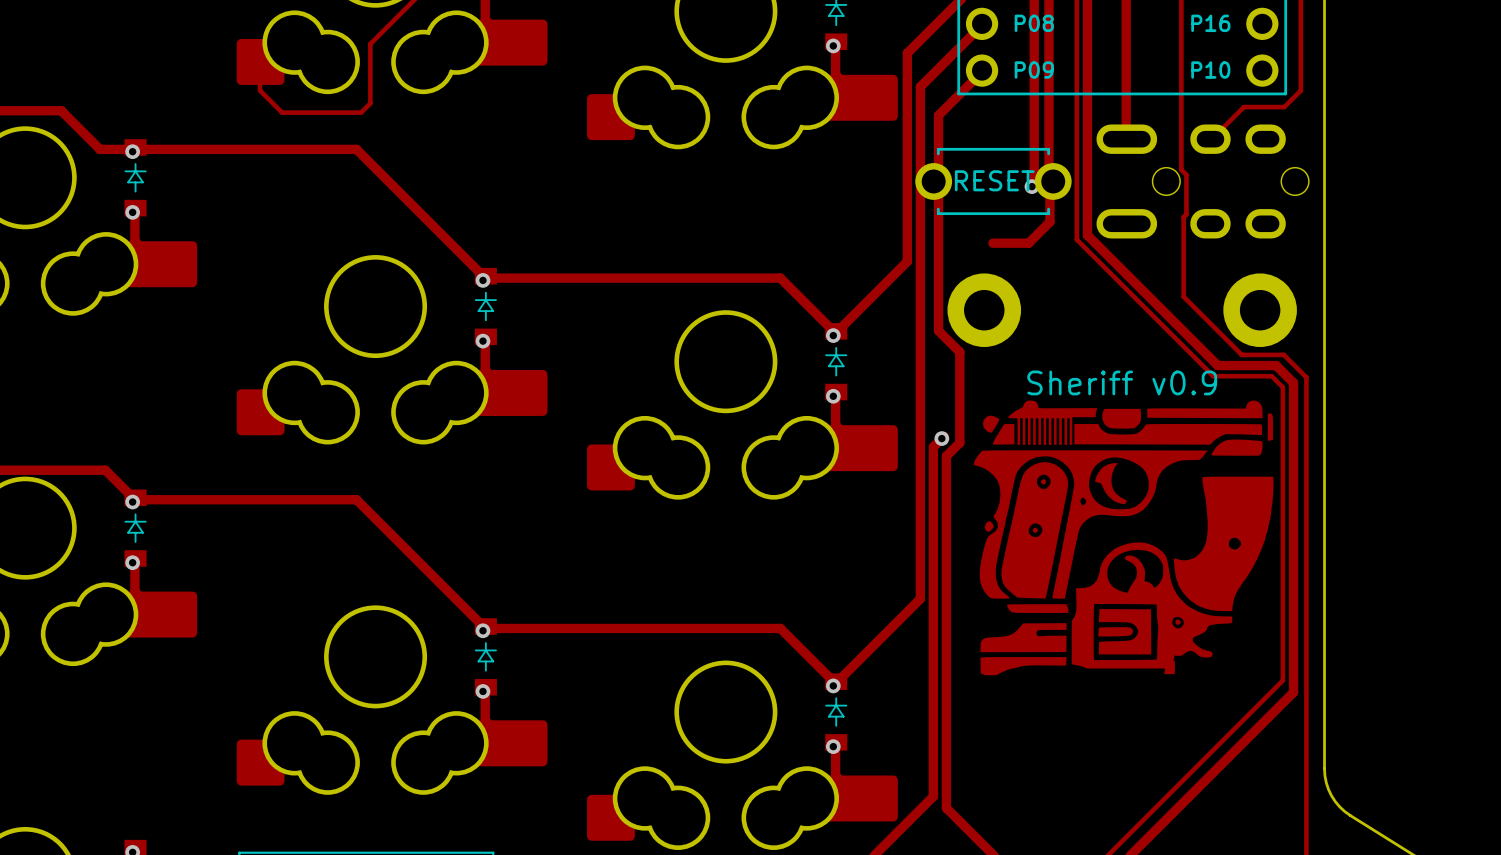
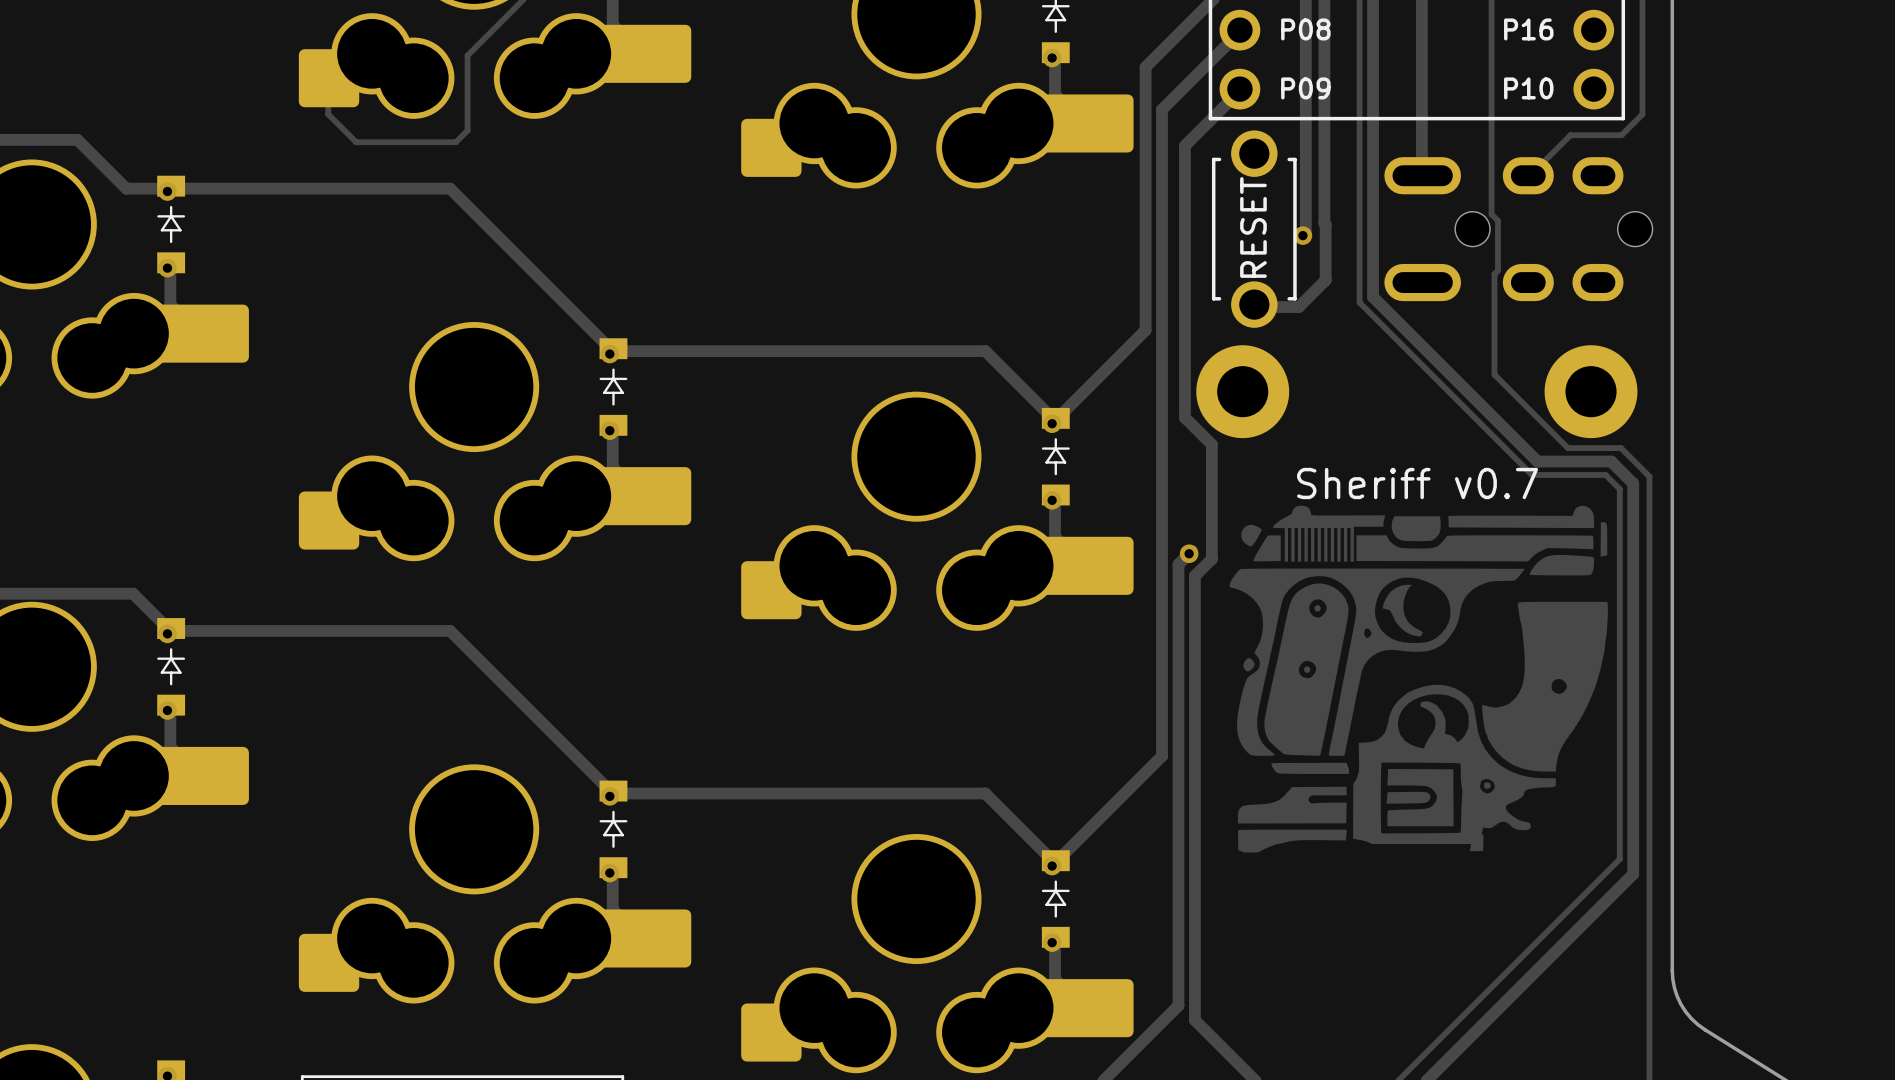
part rotation: 0° (993, 181) -> 90° clockwise (1254, 229)
drawing shape: [1027, 370, 1218, 396] -> [1297, 467, 1539, 500]

